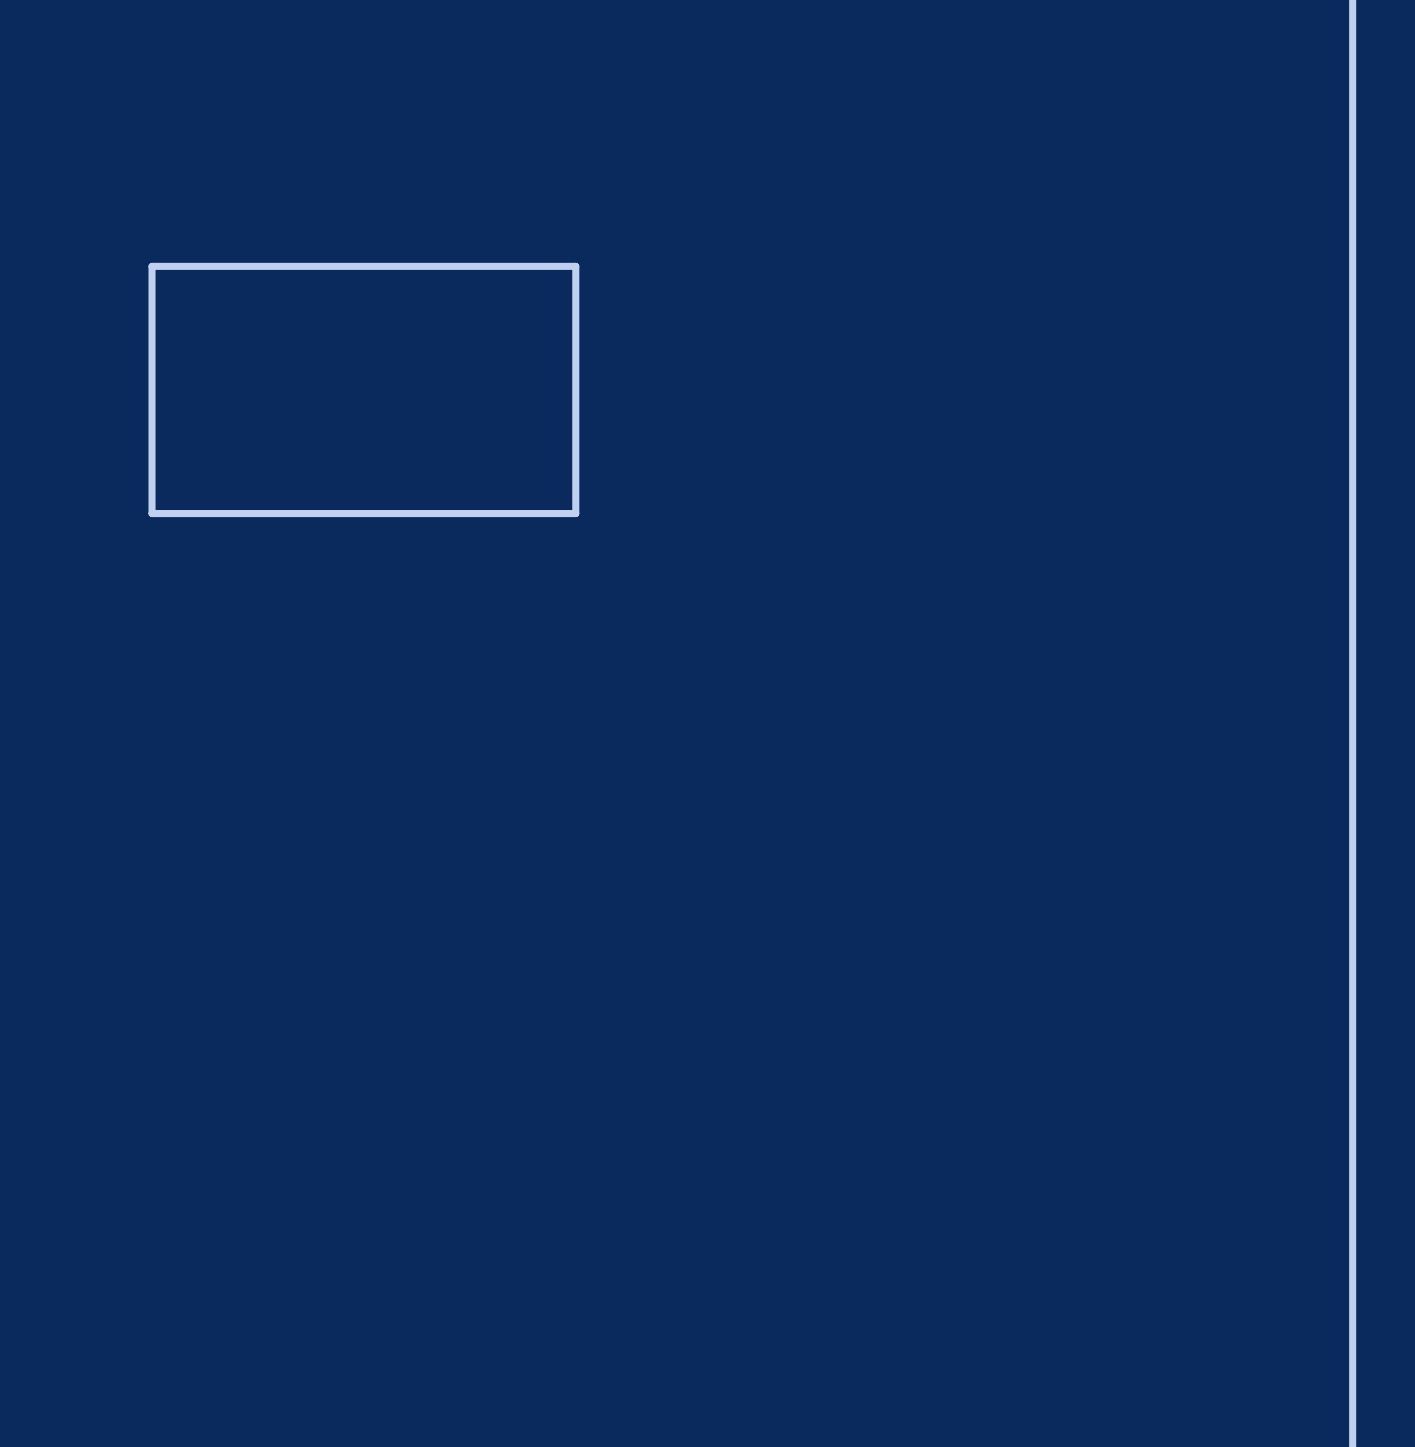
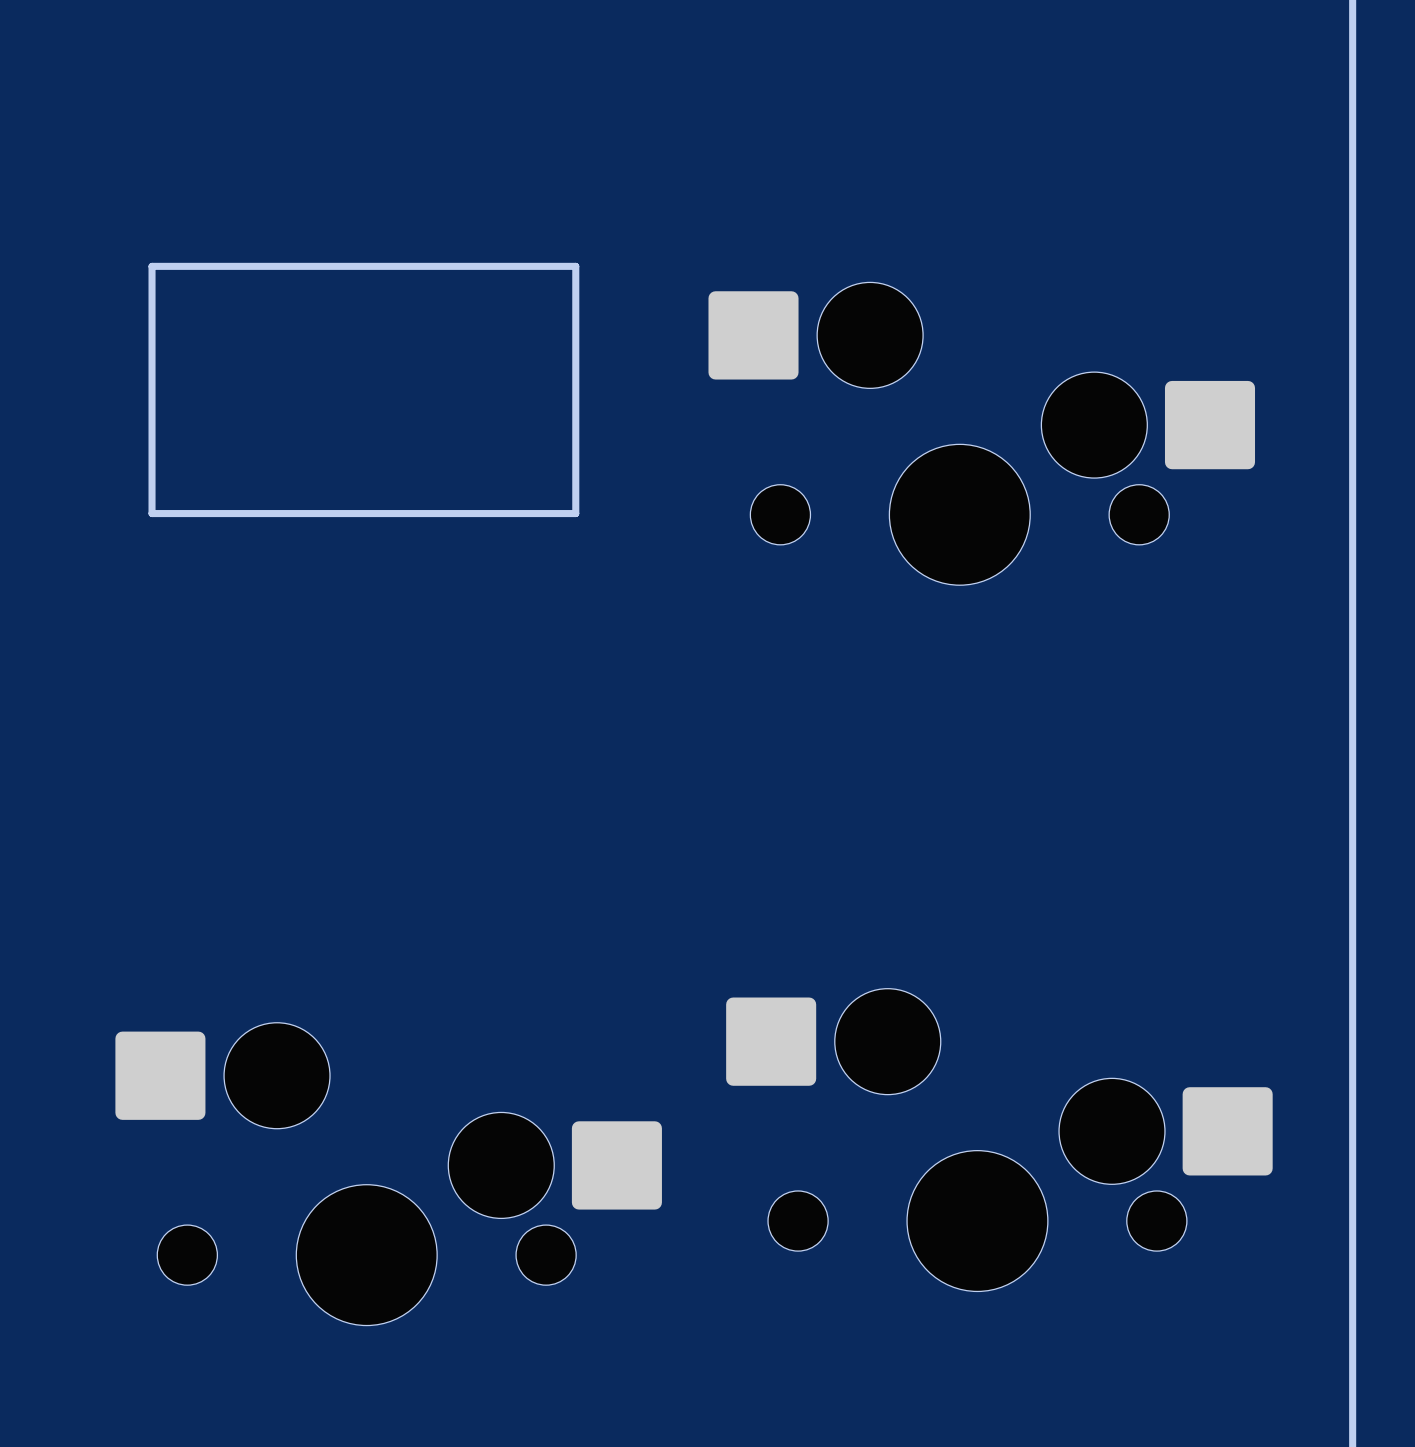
part: none -> (981, 433)
part: none -> (999, 1140)
part: none -> (388, 1174)

